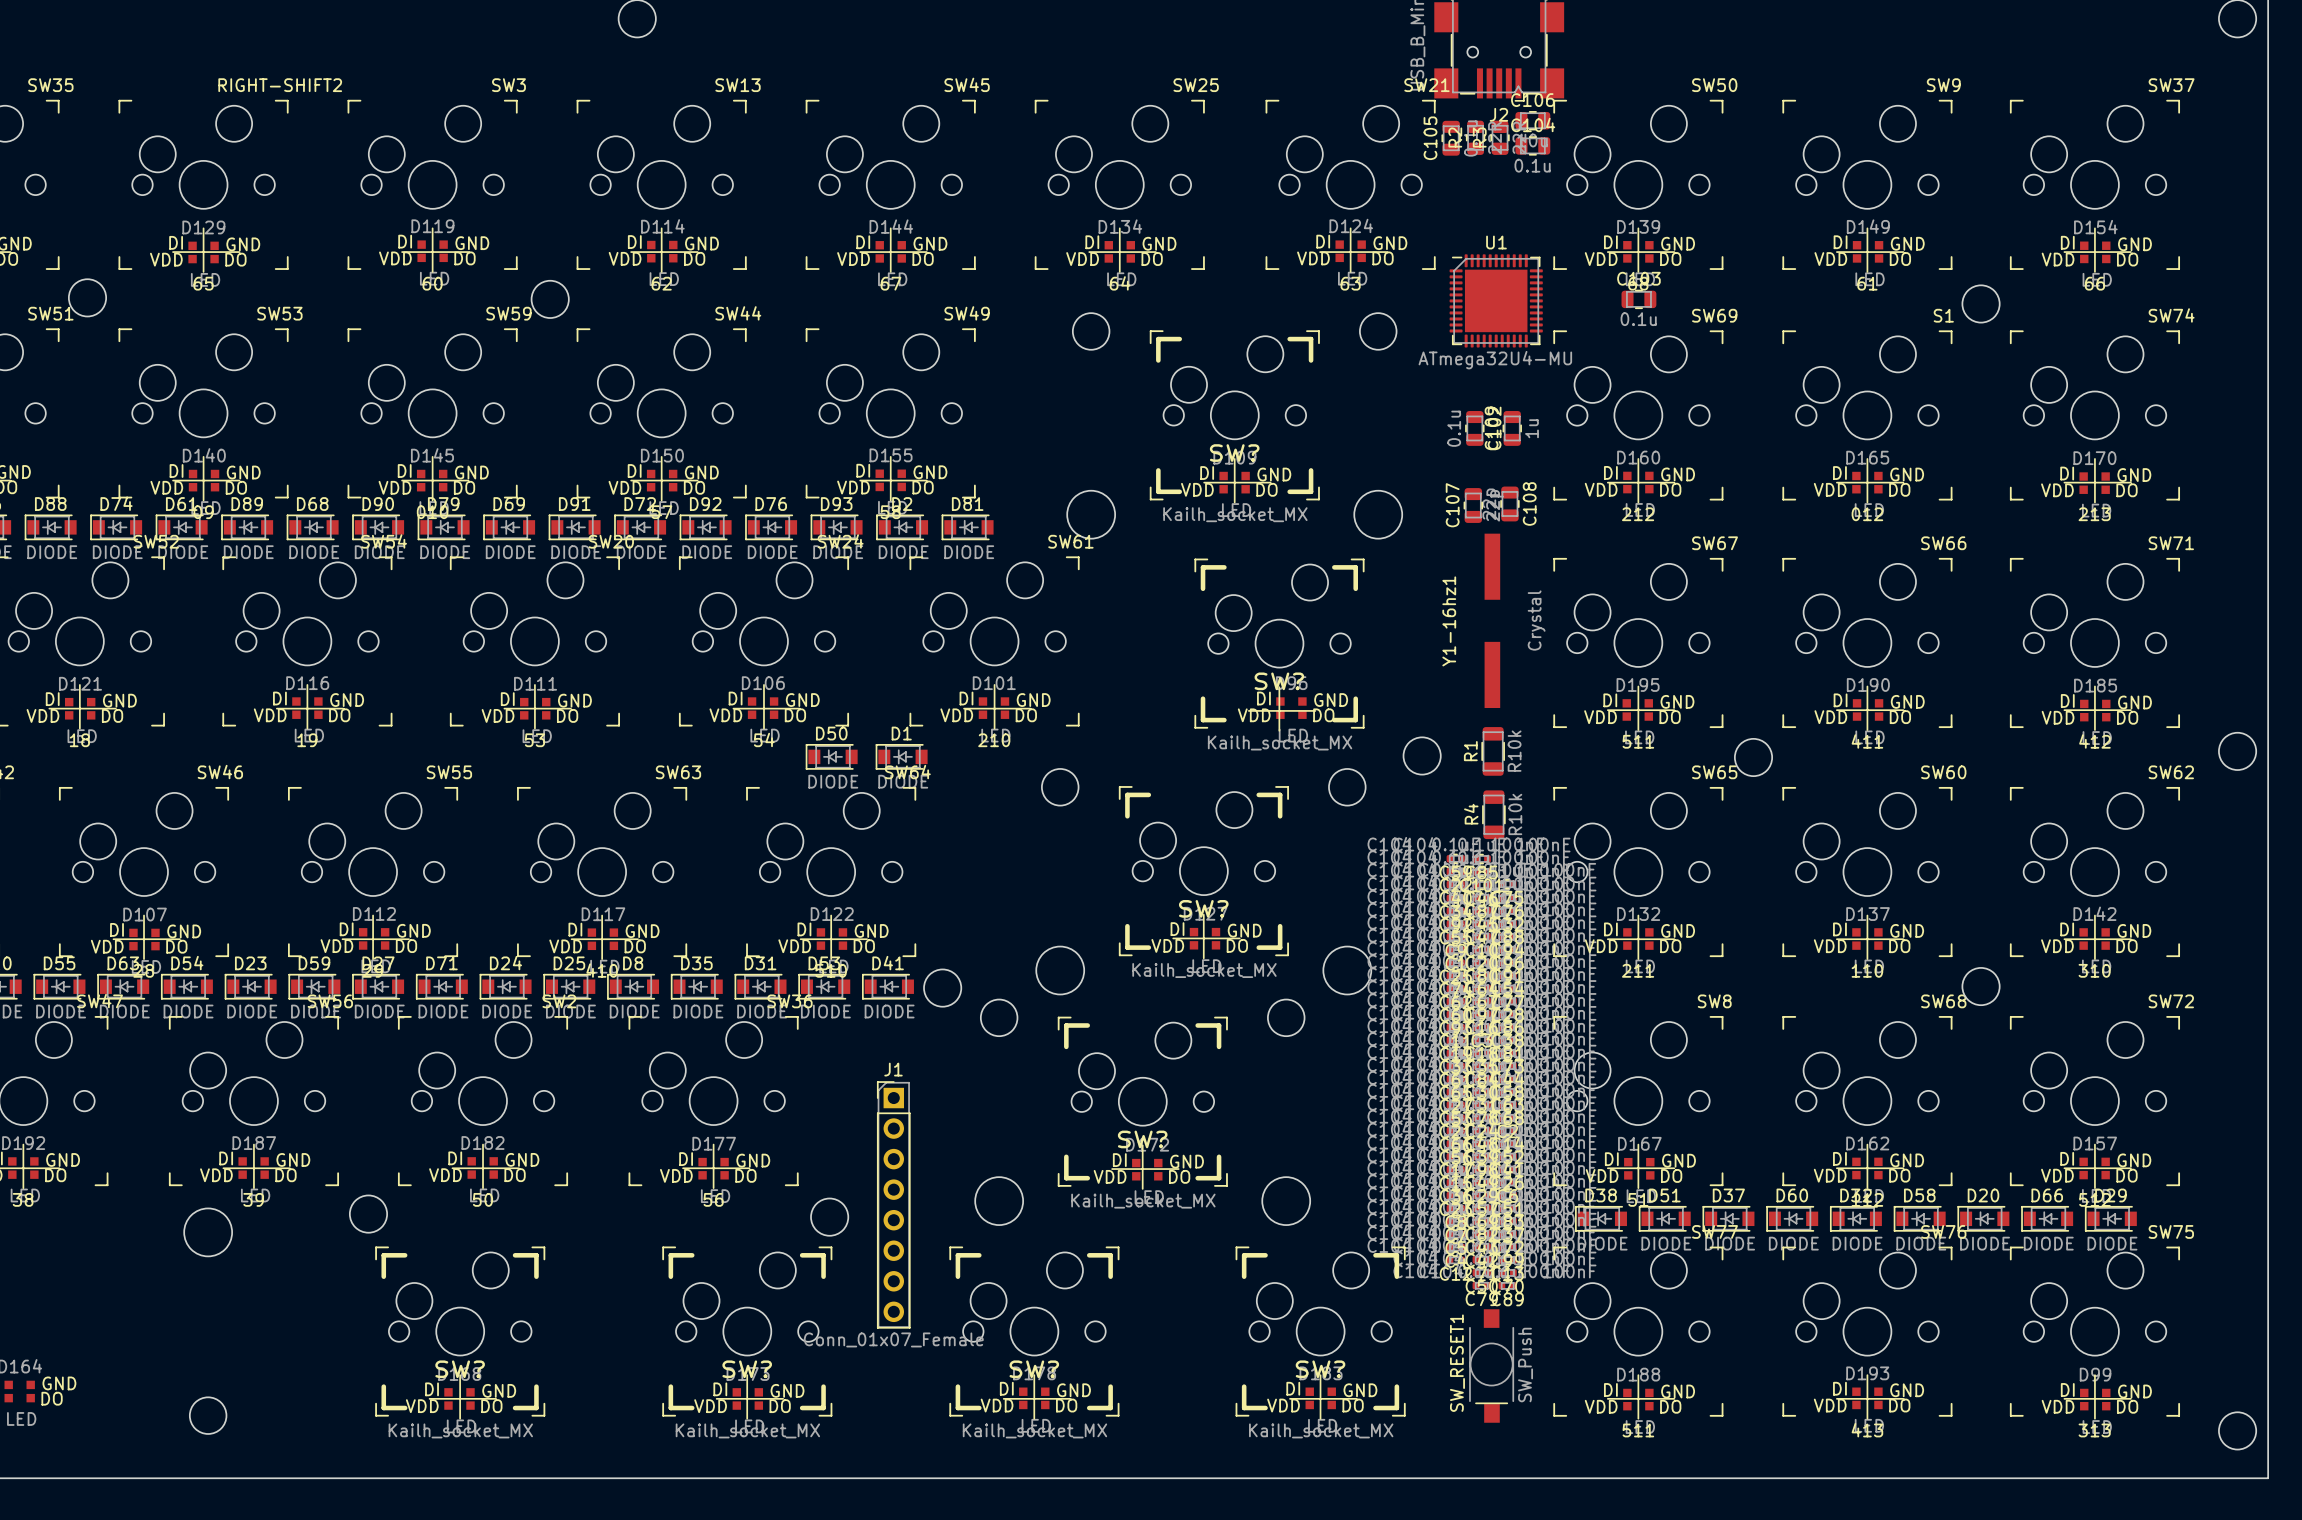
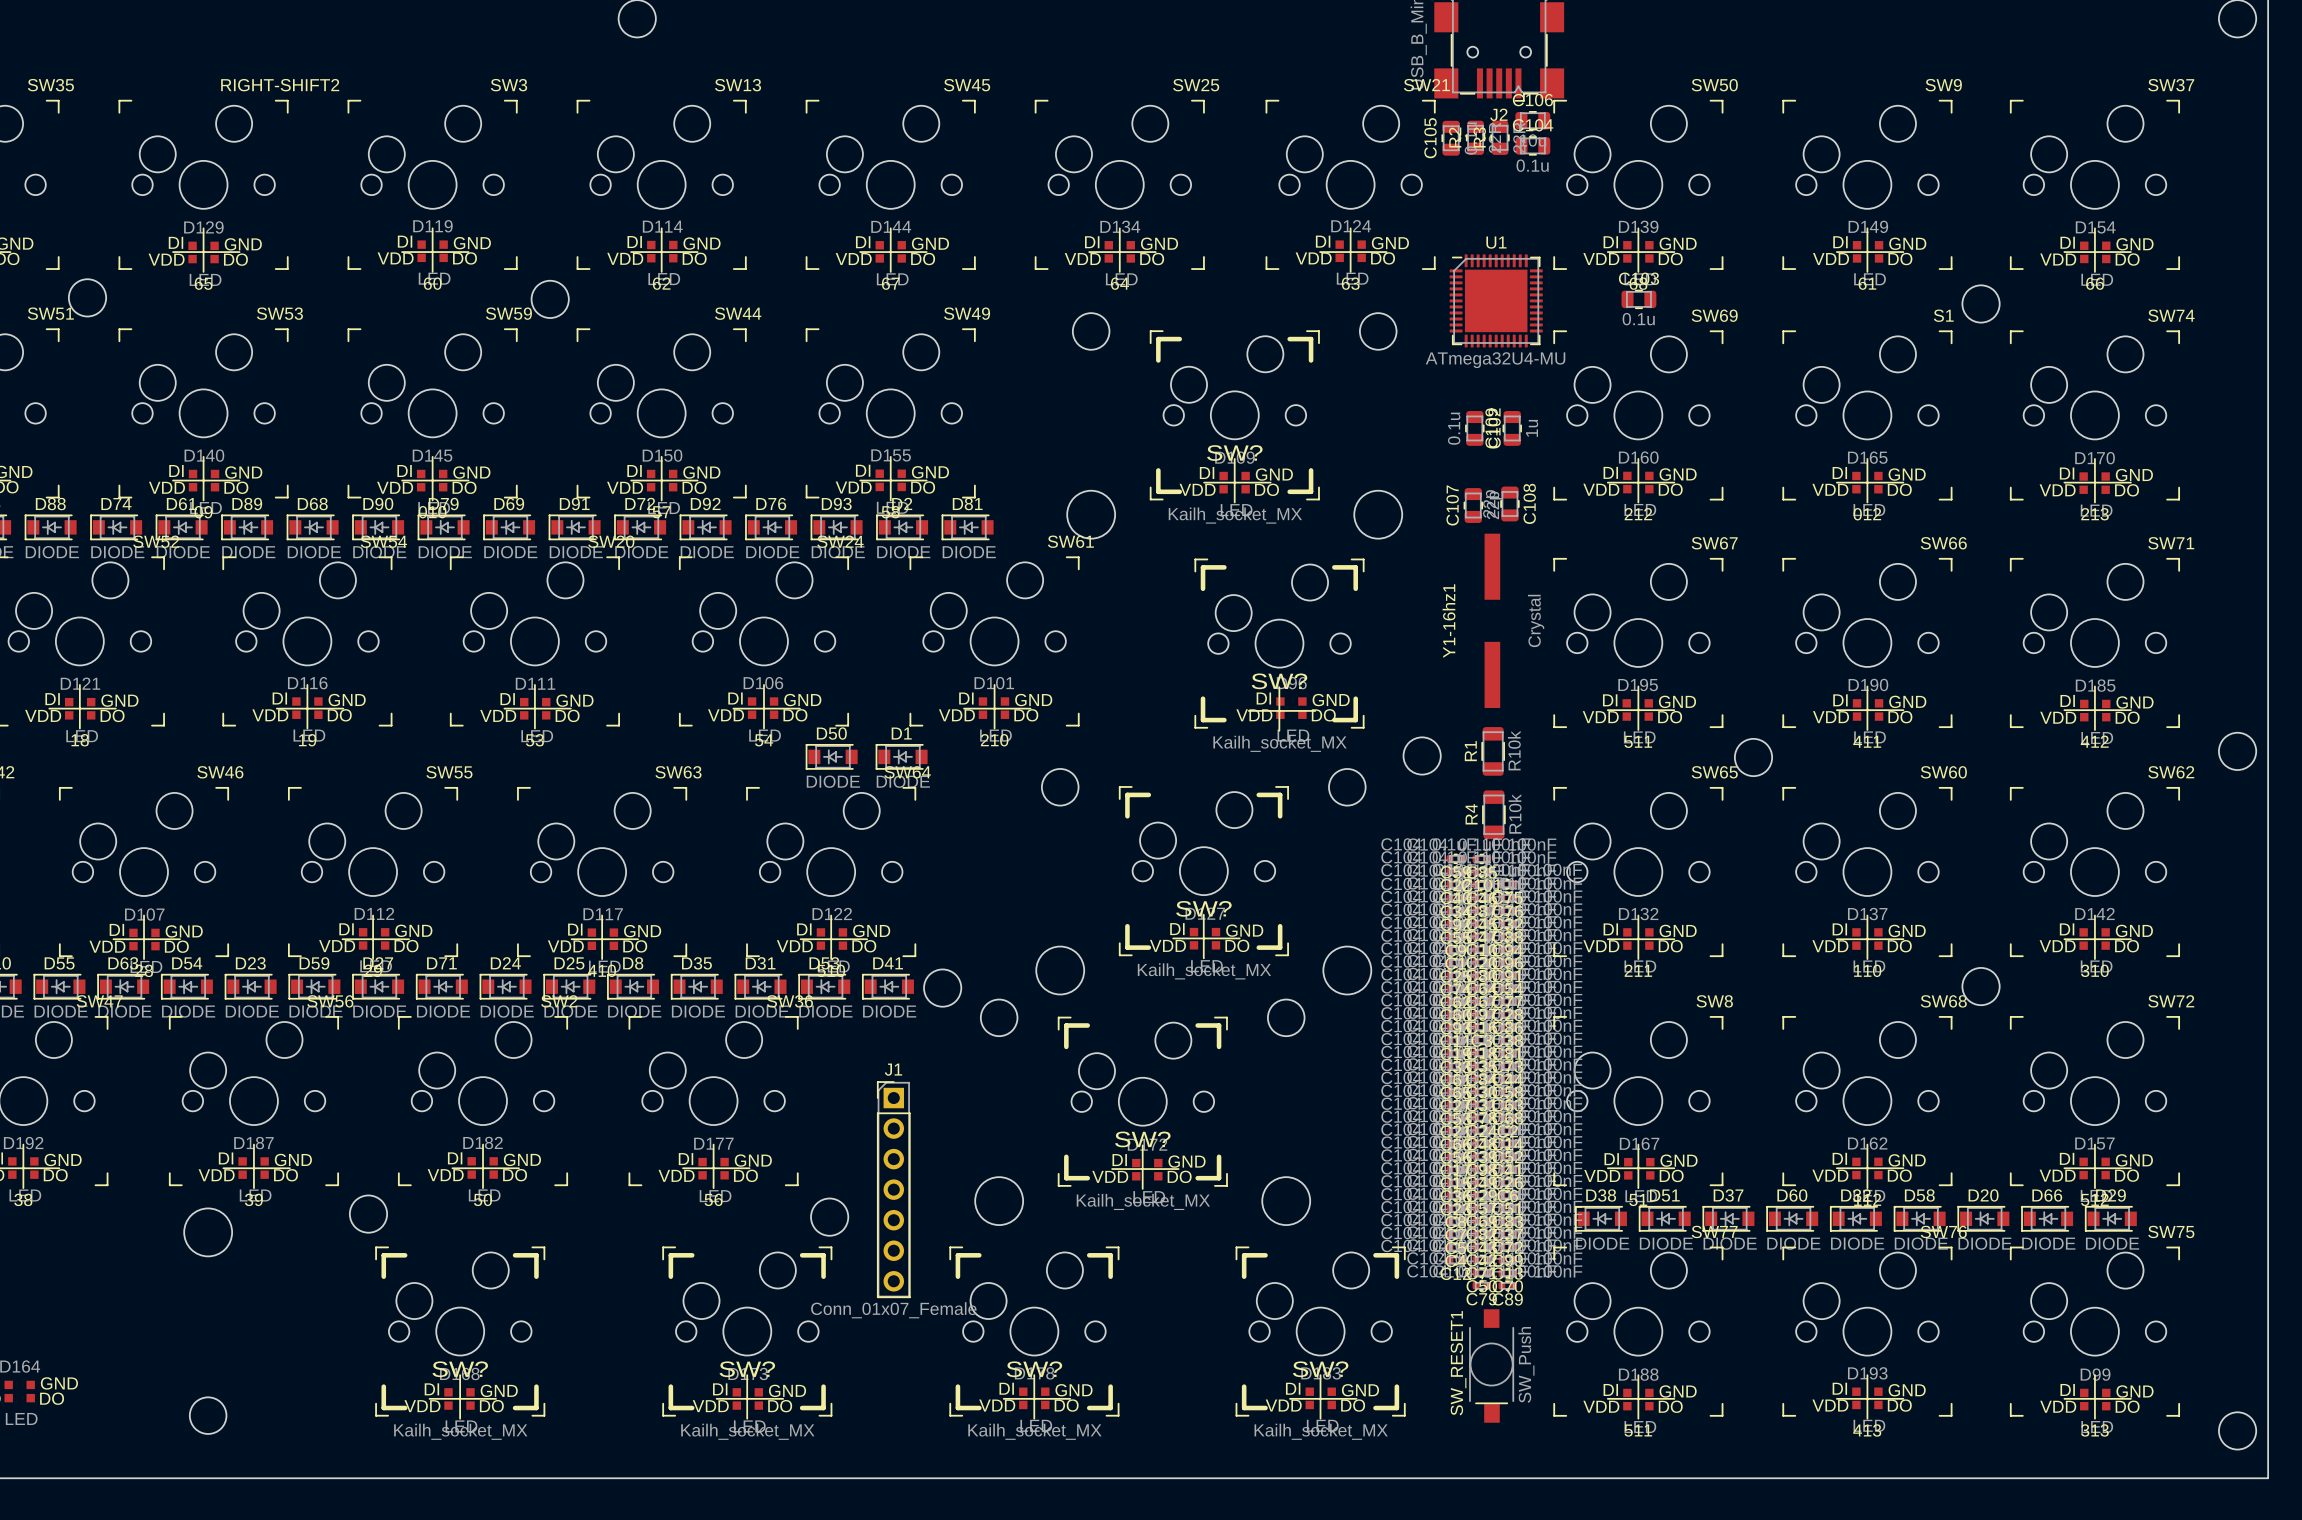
J1 footprint: [877, 1081, 911, 1329] -> [877, 1081, 911, 1298]

